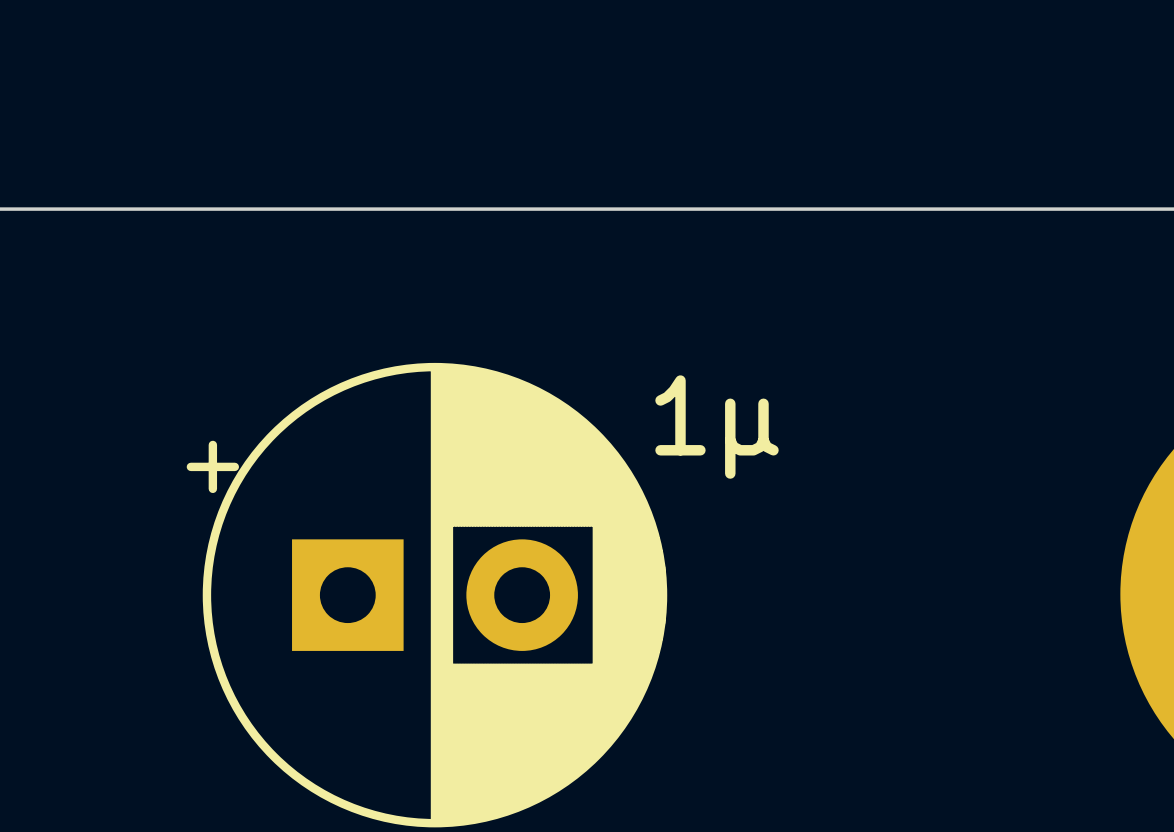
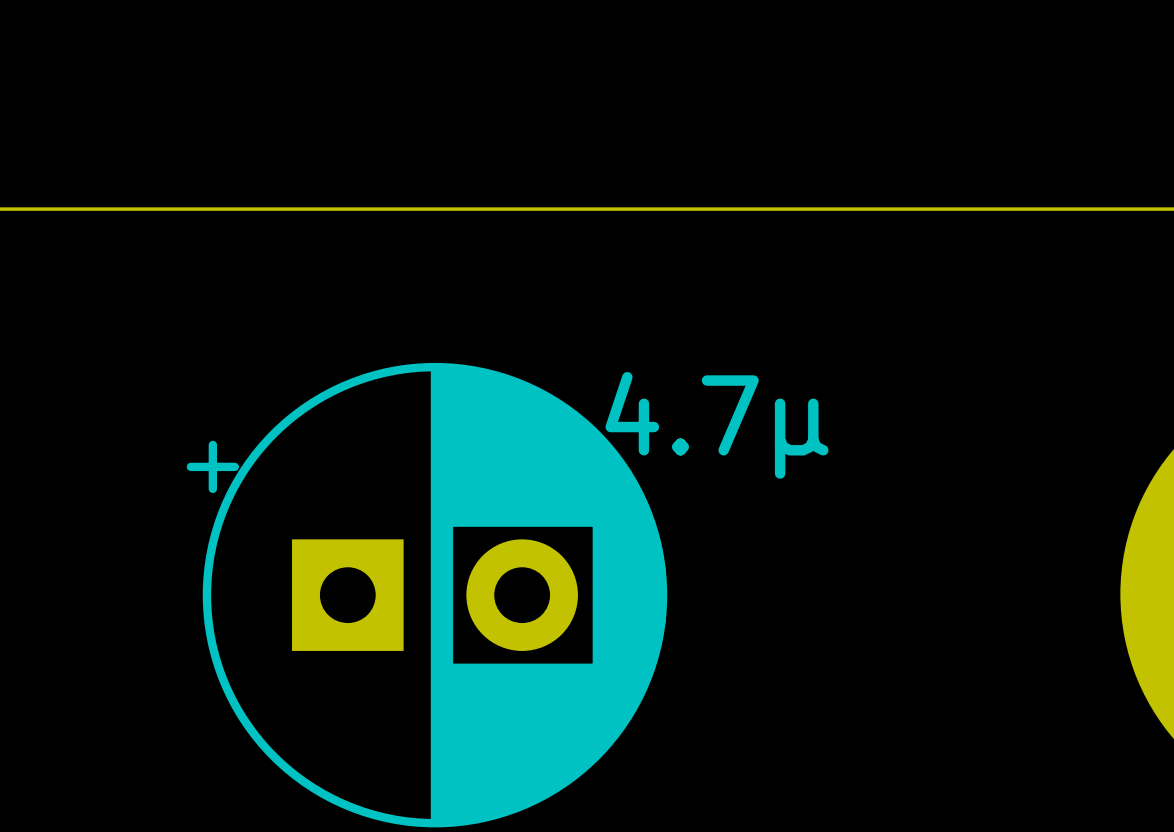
part value: 1µ (717, 427) -> 4.7µ (717, 425)

